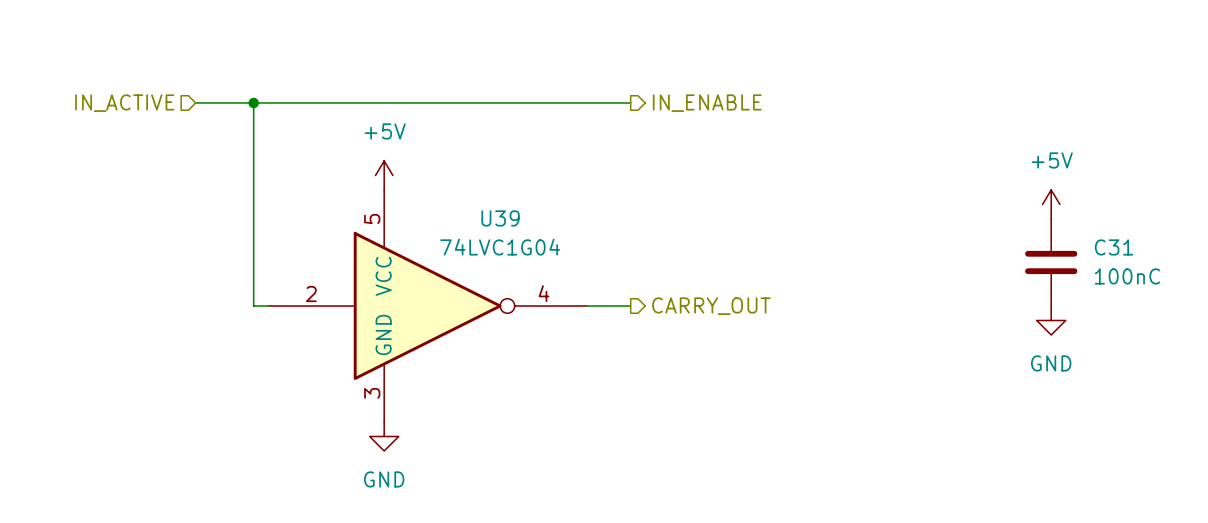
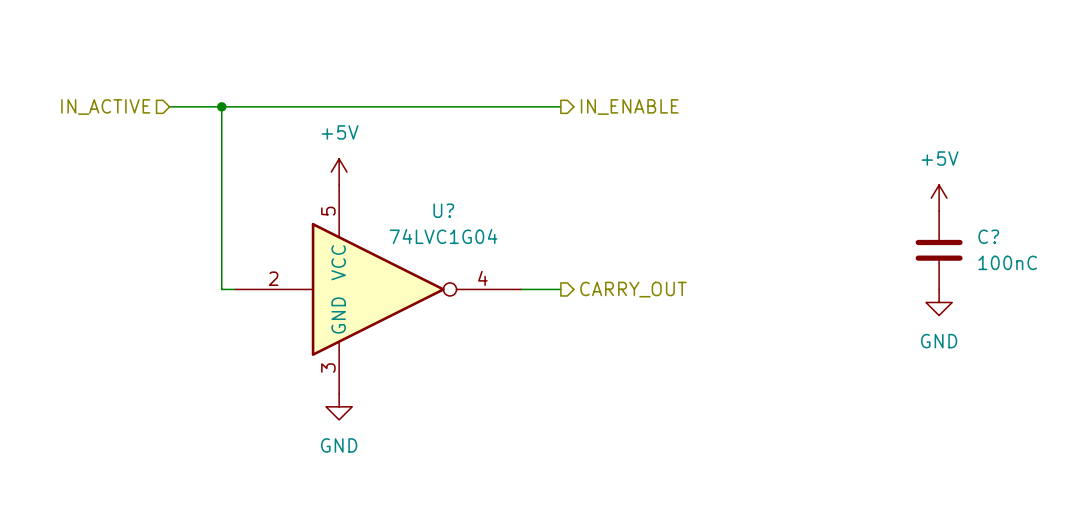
U39 name: U39 (500, 218) -> U? (443, 210)
C31 name: C31 (1114, 247) -> C? (988, 236)

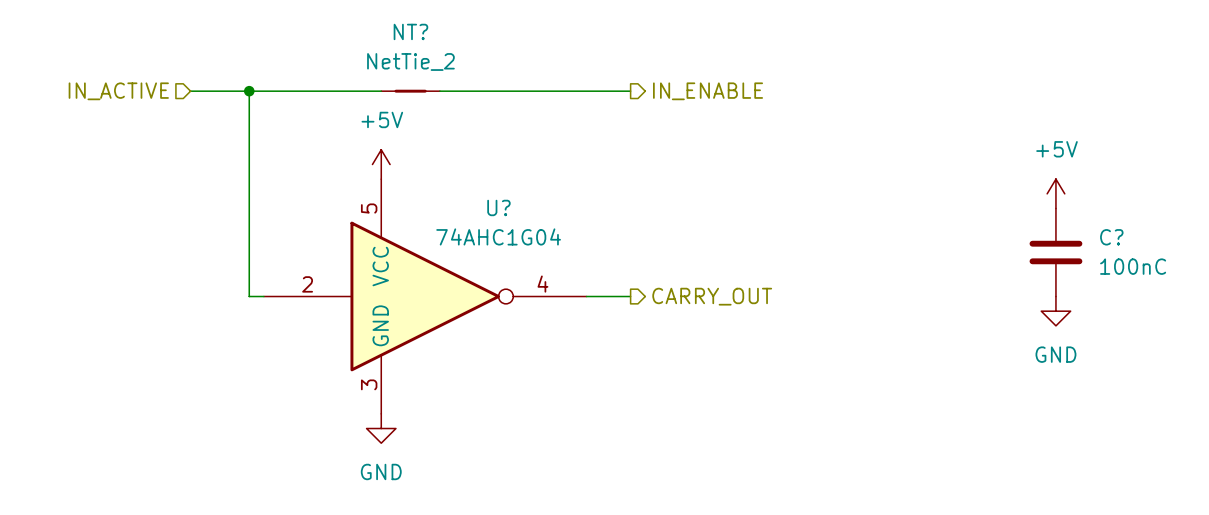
NT?: none -> NetTie_2 (410, 91)
U? value: 74LVC1G04 (443, 236) -> 74AHC1G04 (498, 236)

